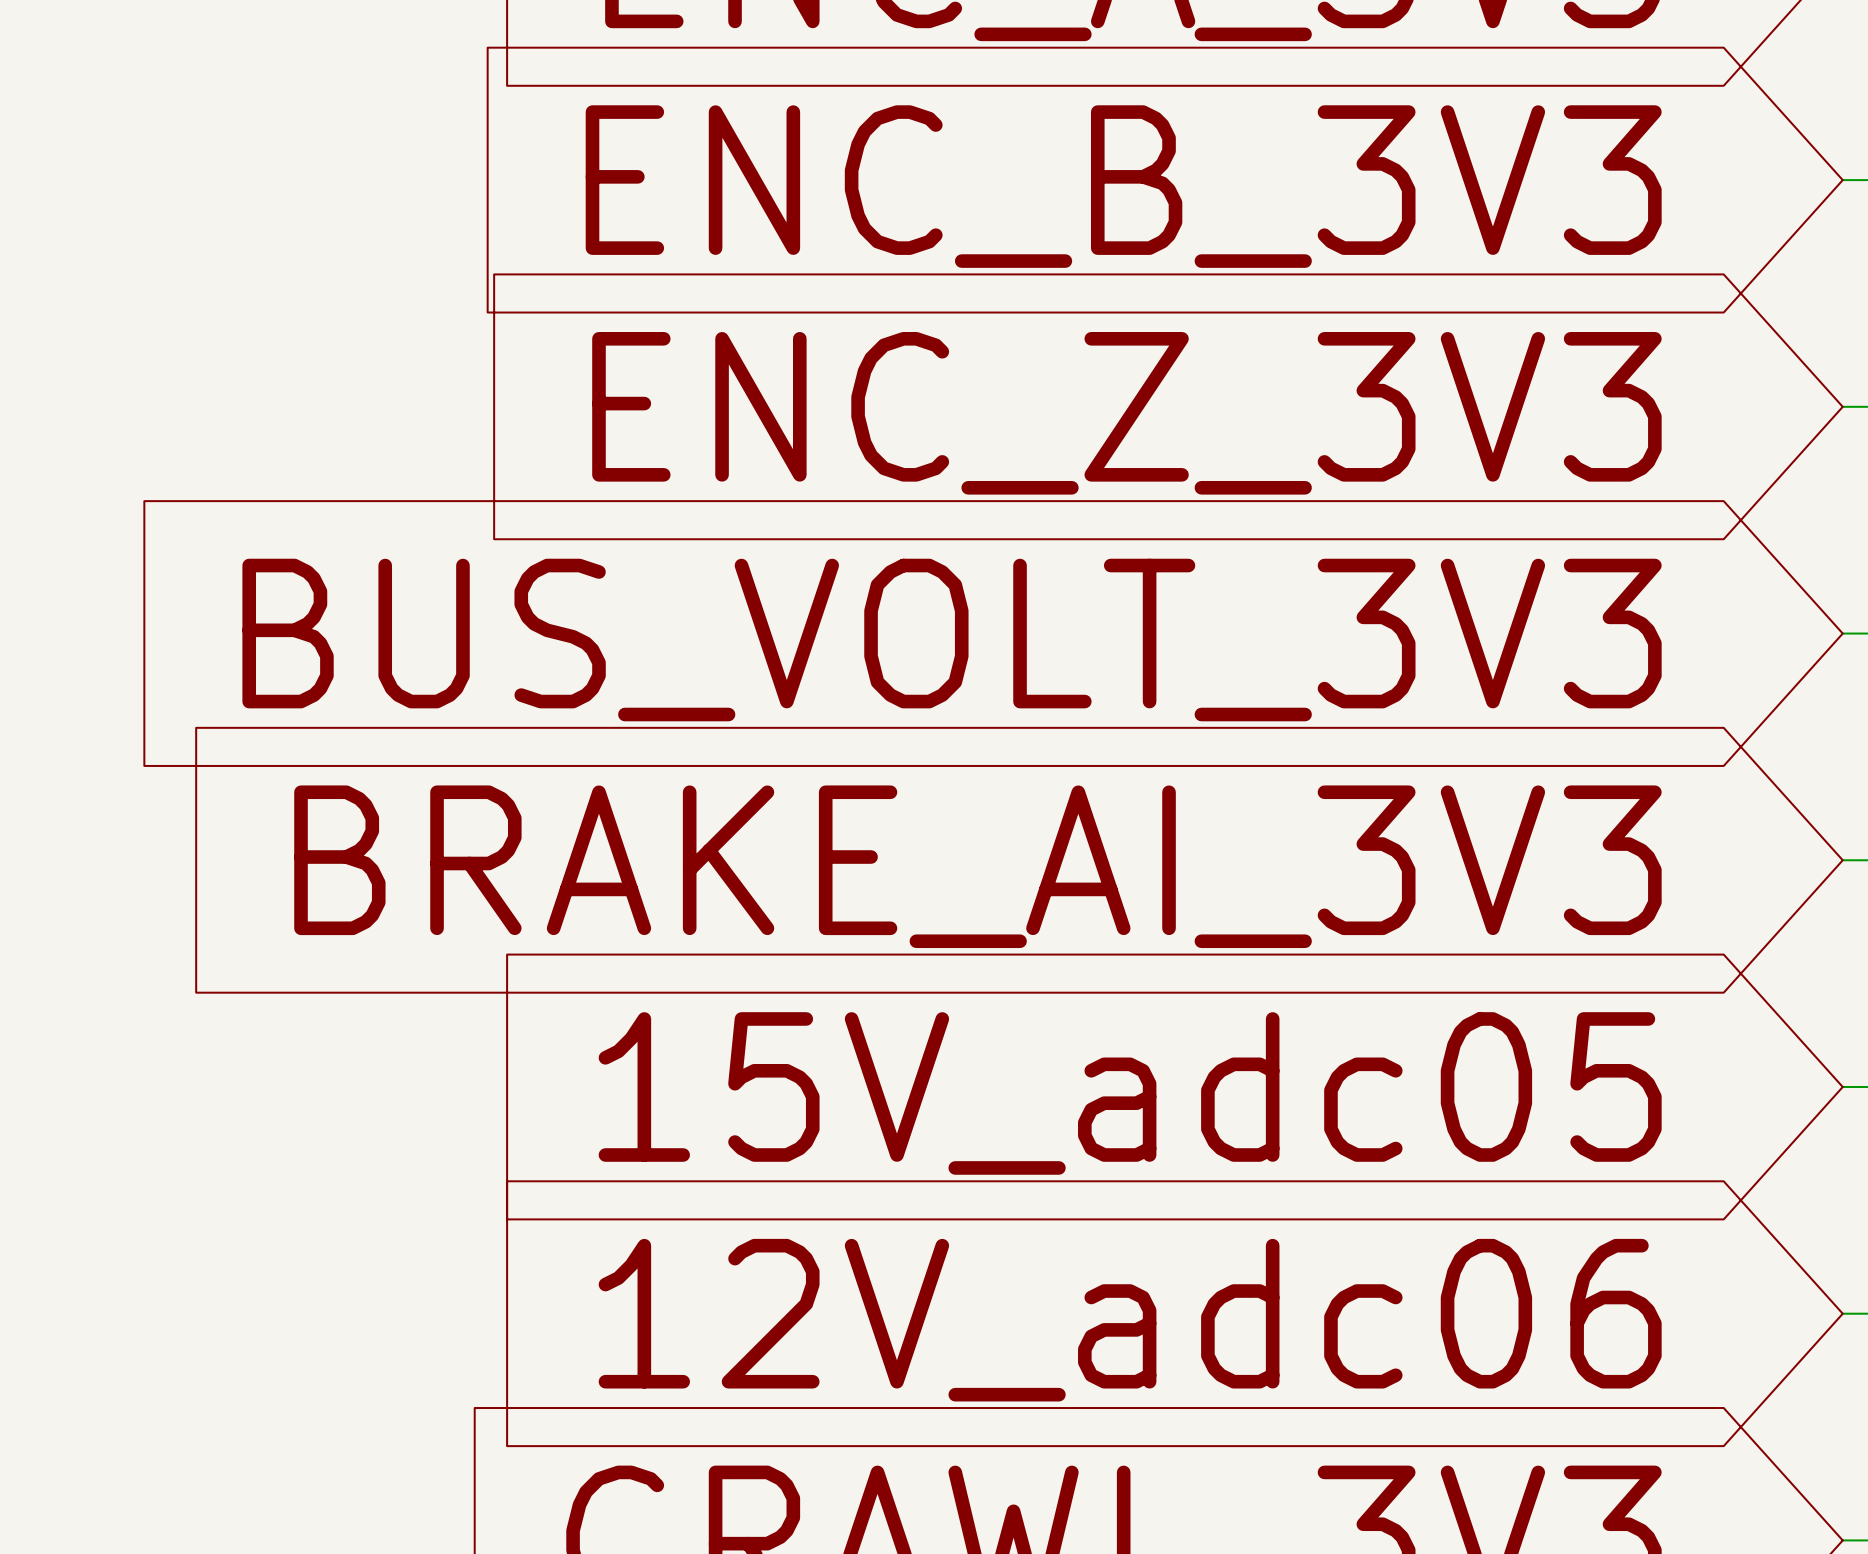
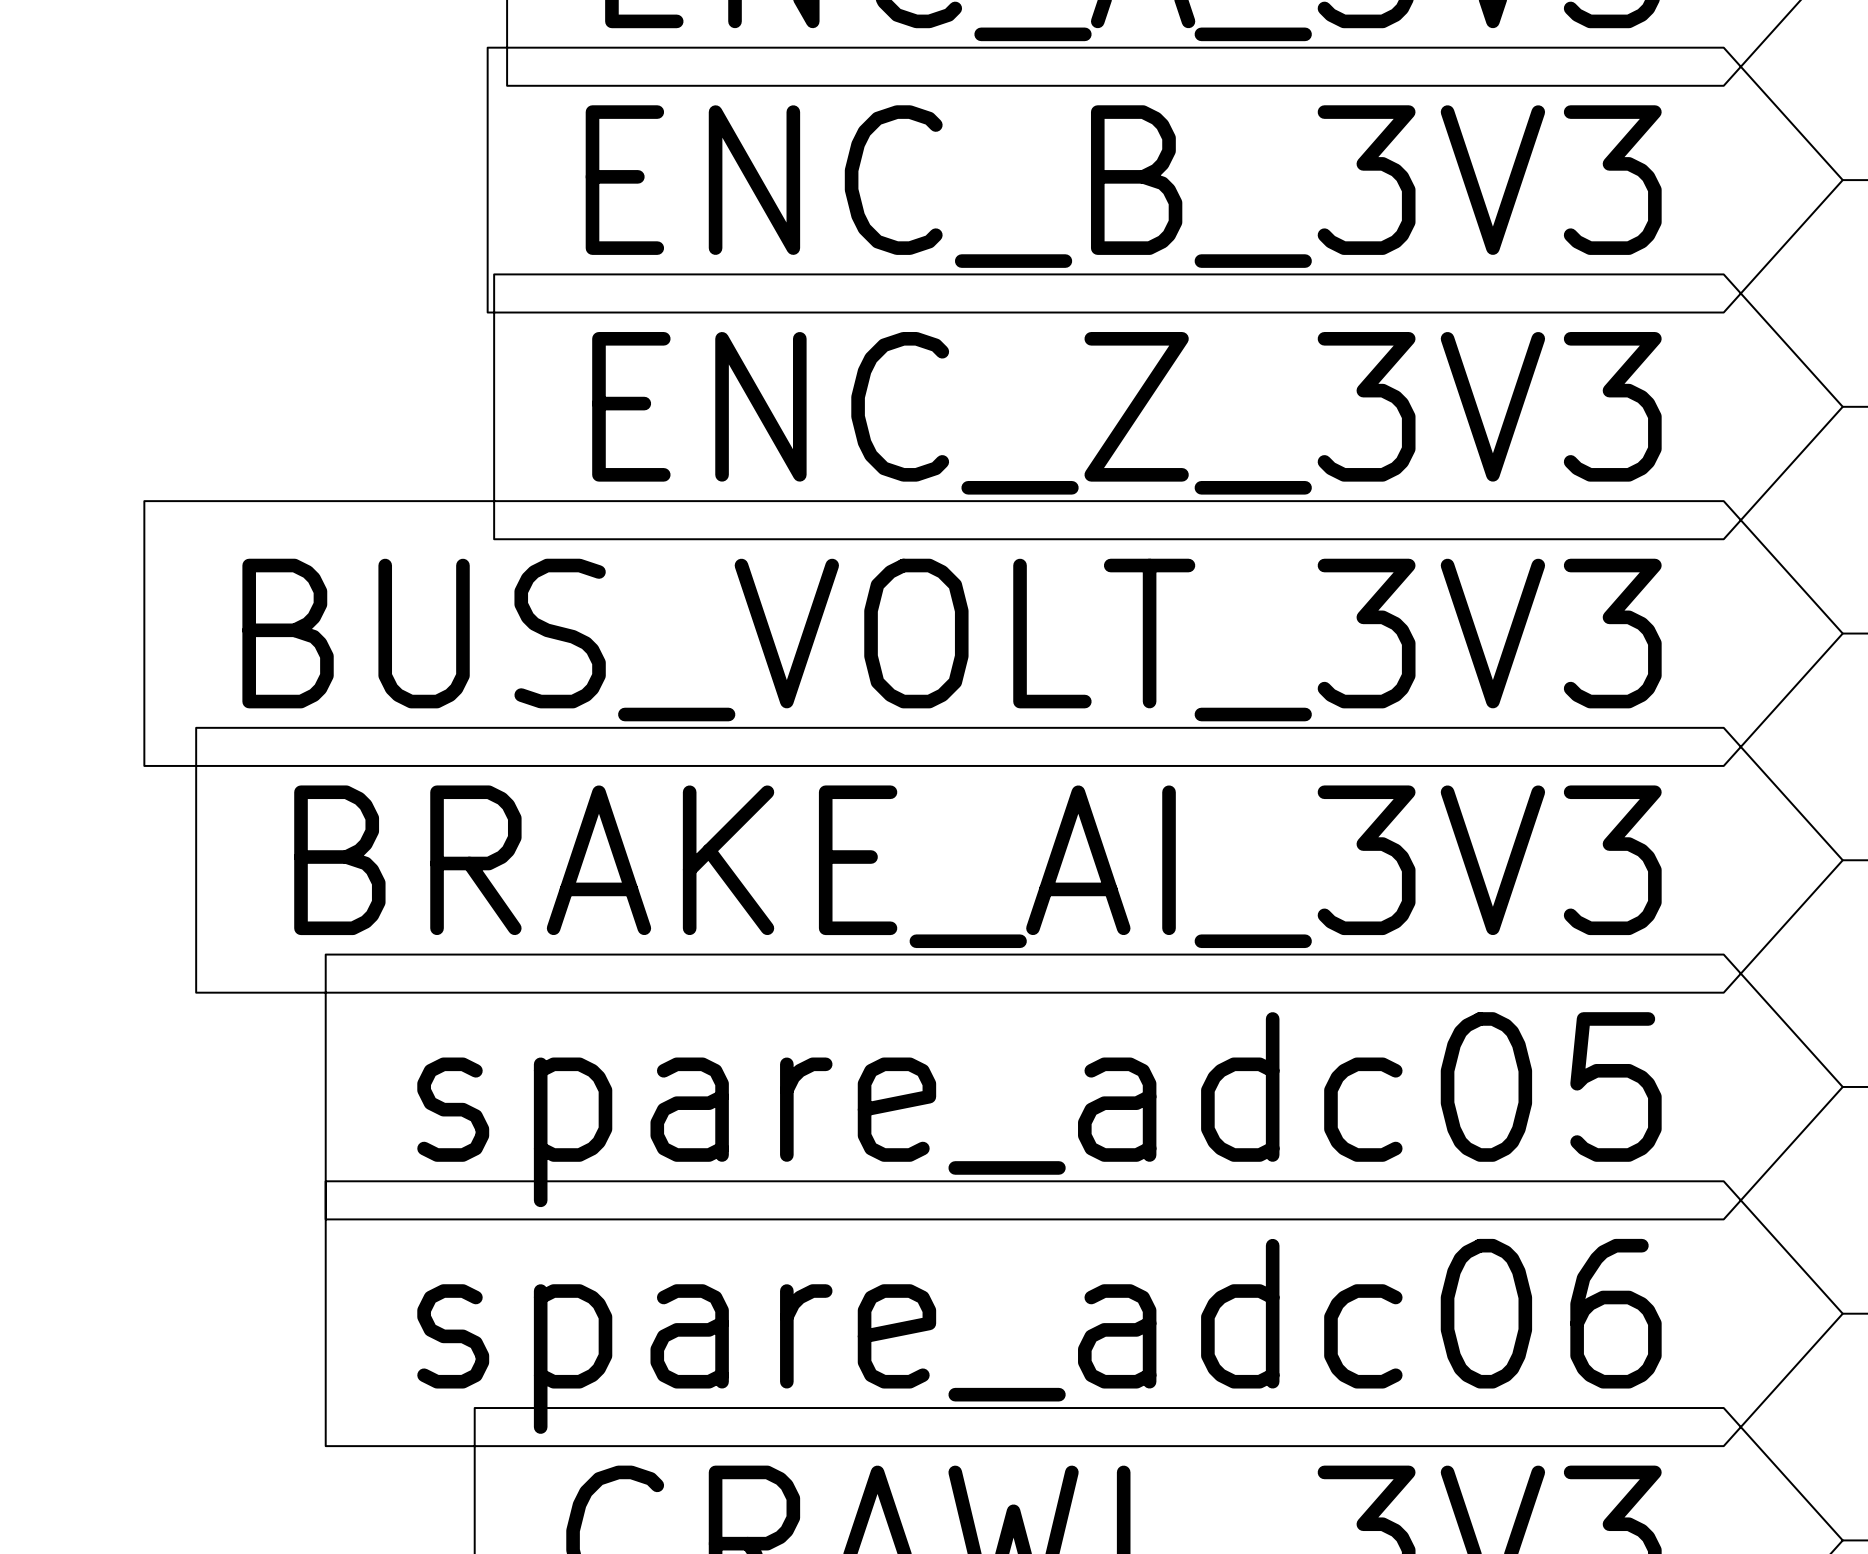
global label: 15V_adc05 (1130, 1093) -> spare_adc05 (1039, 1109)
global label: 12V_adc06 (1130, 1320) -> spare_adc06 (1039, 1336)

